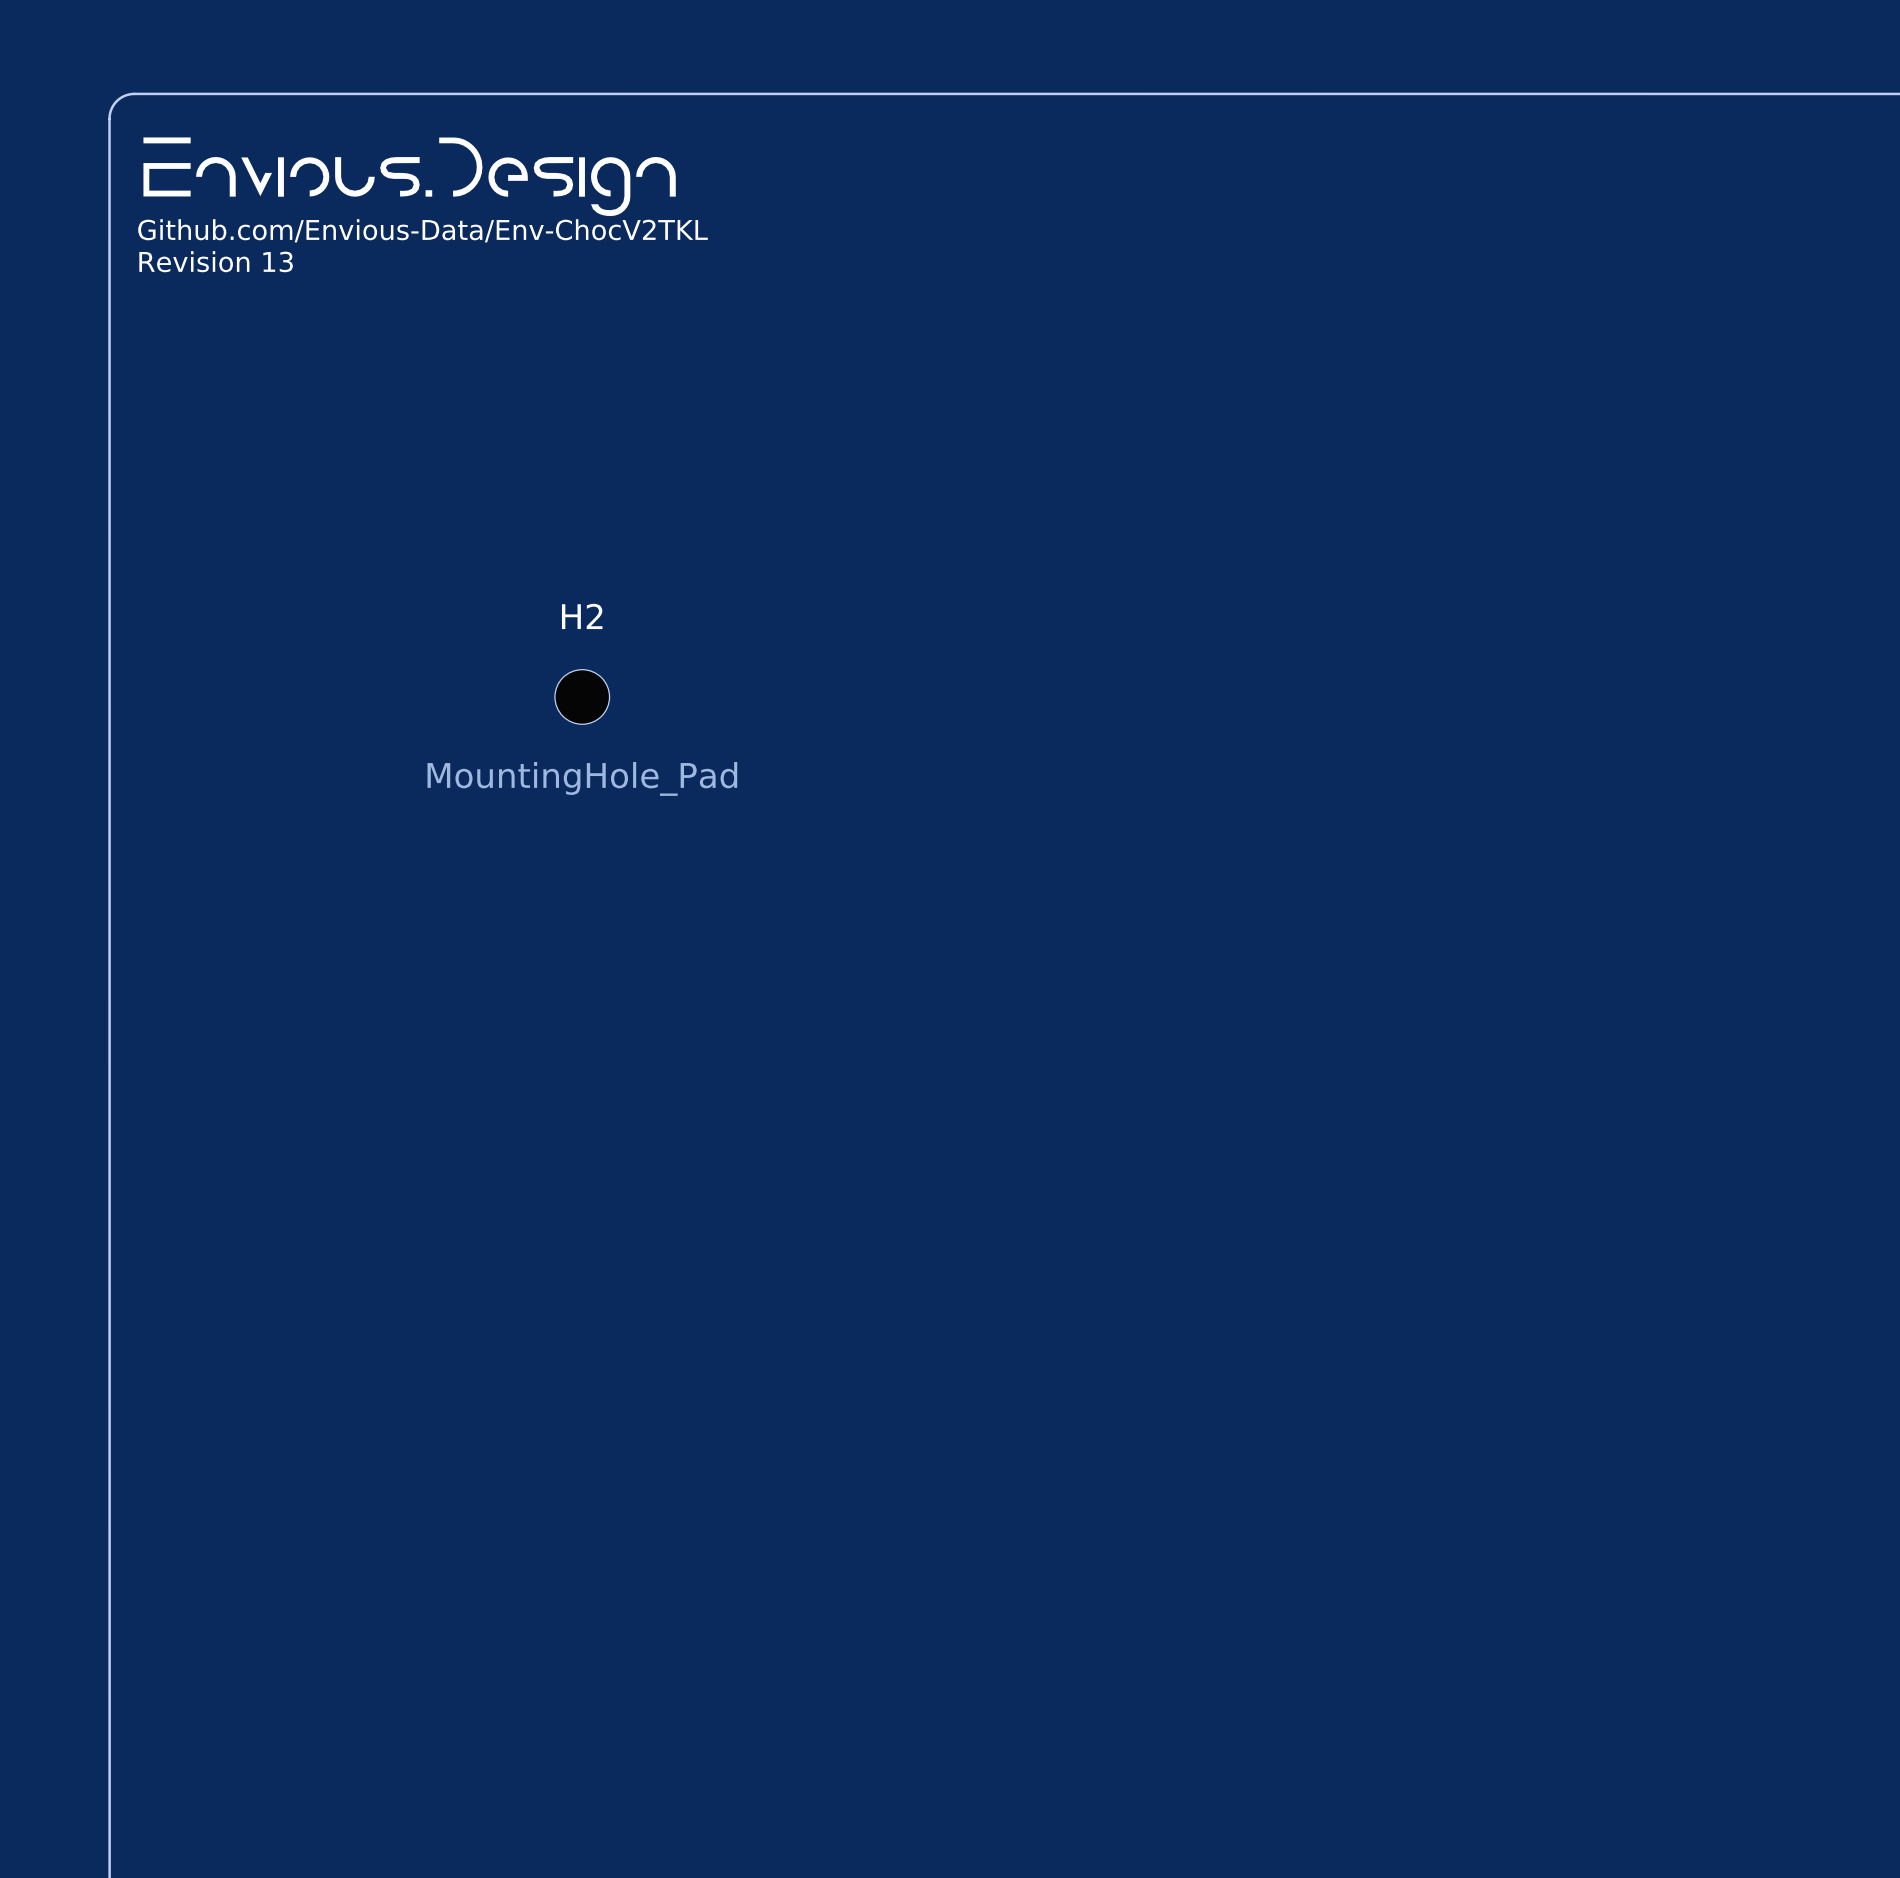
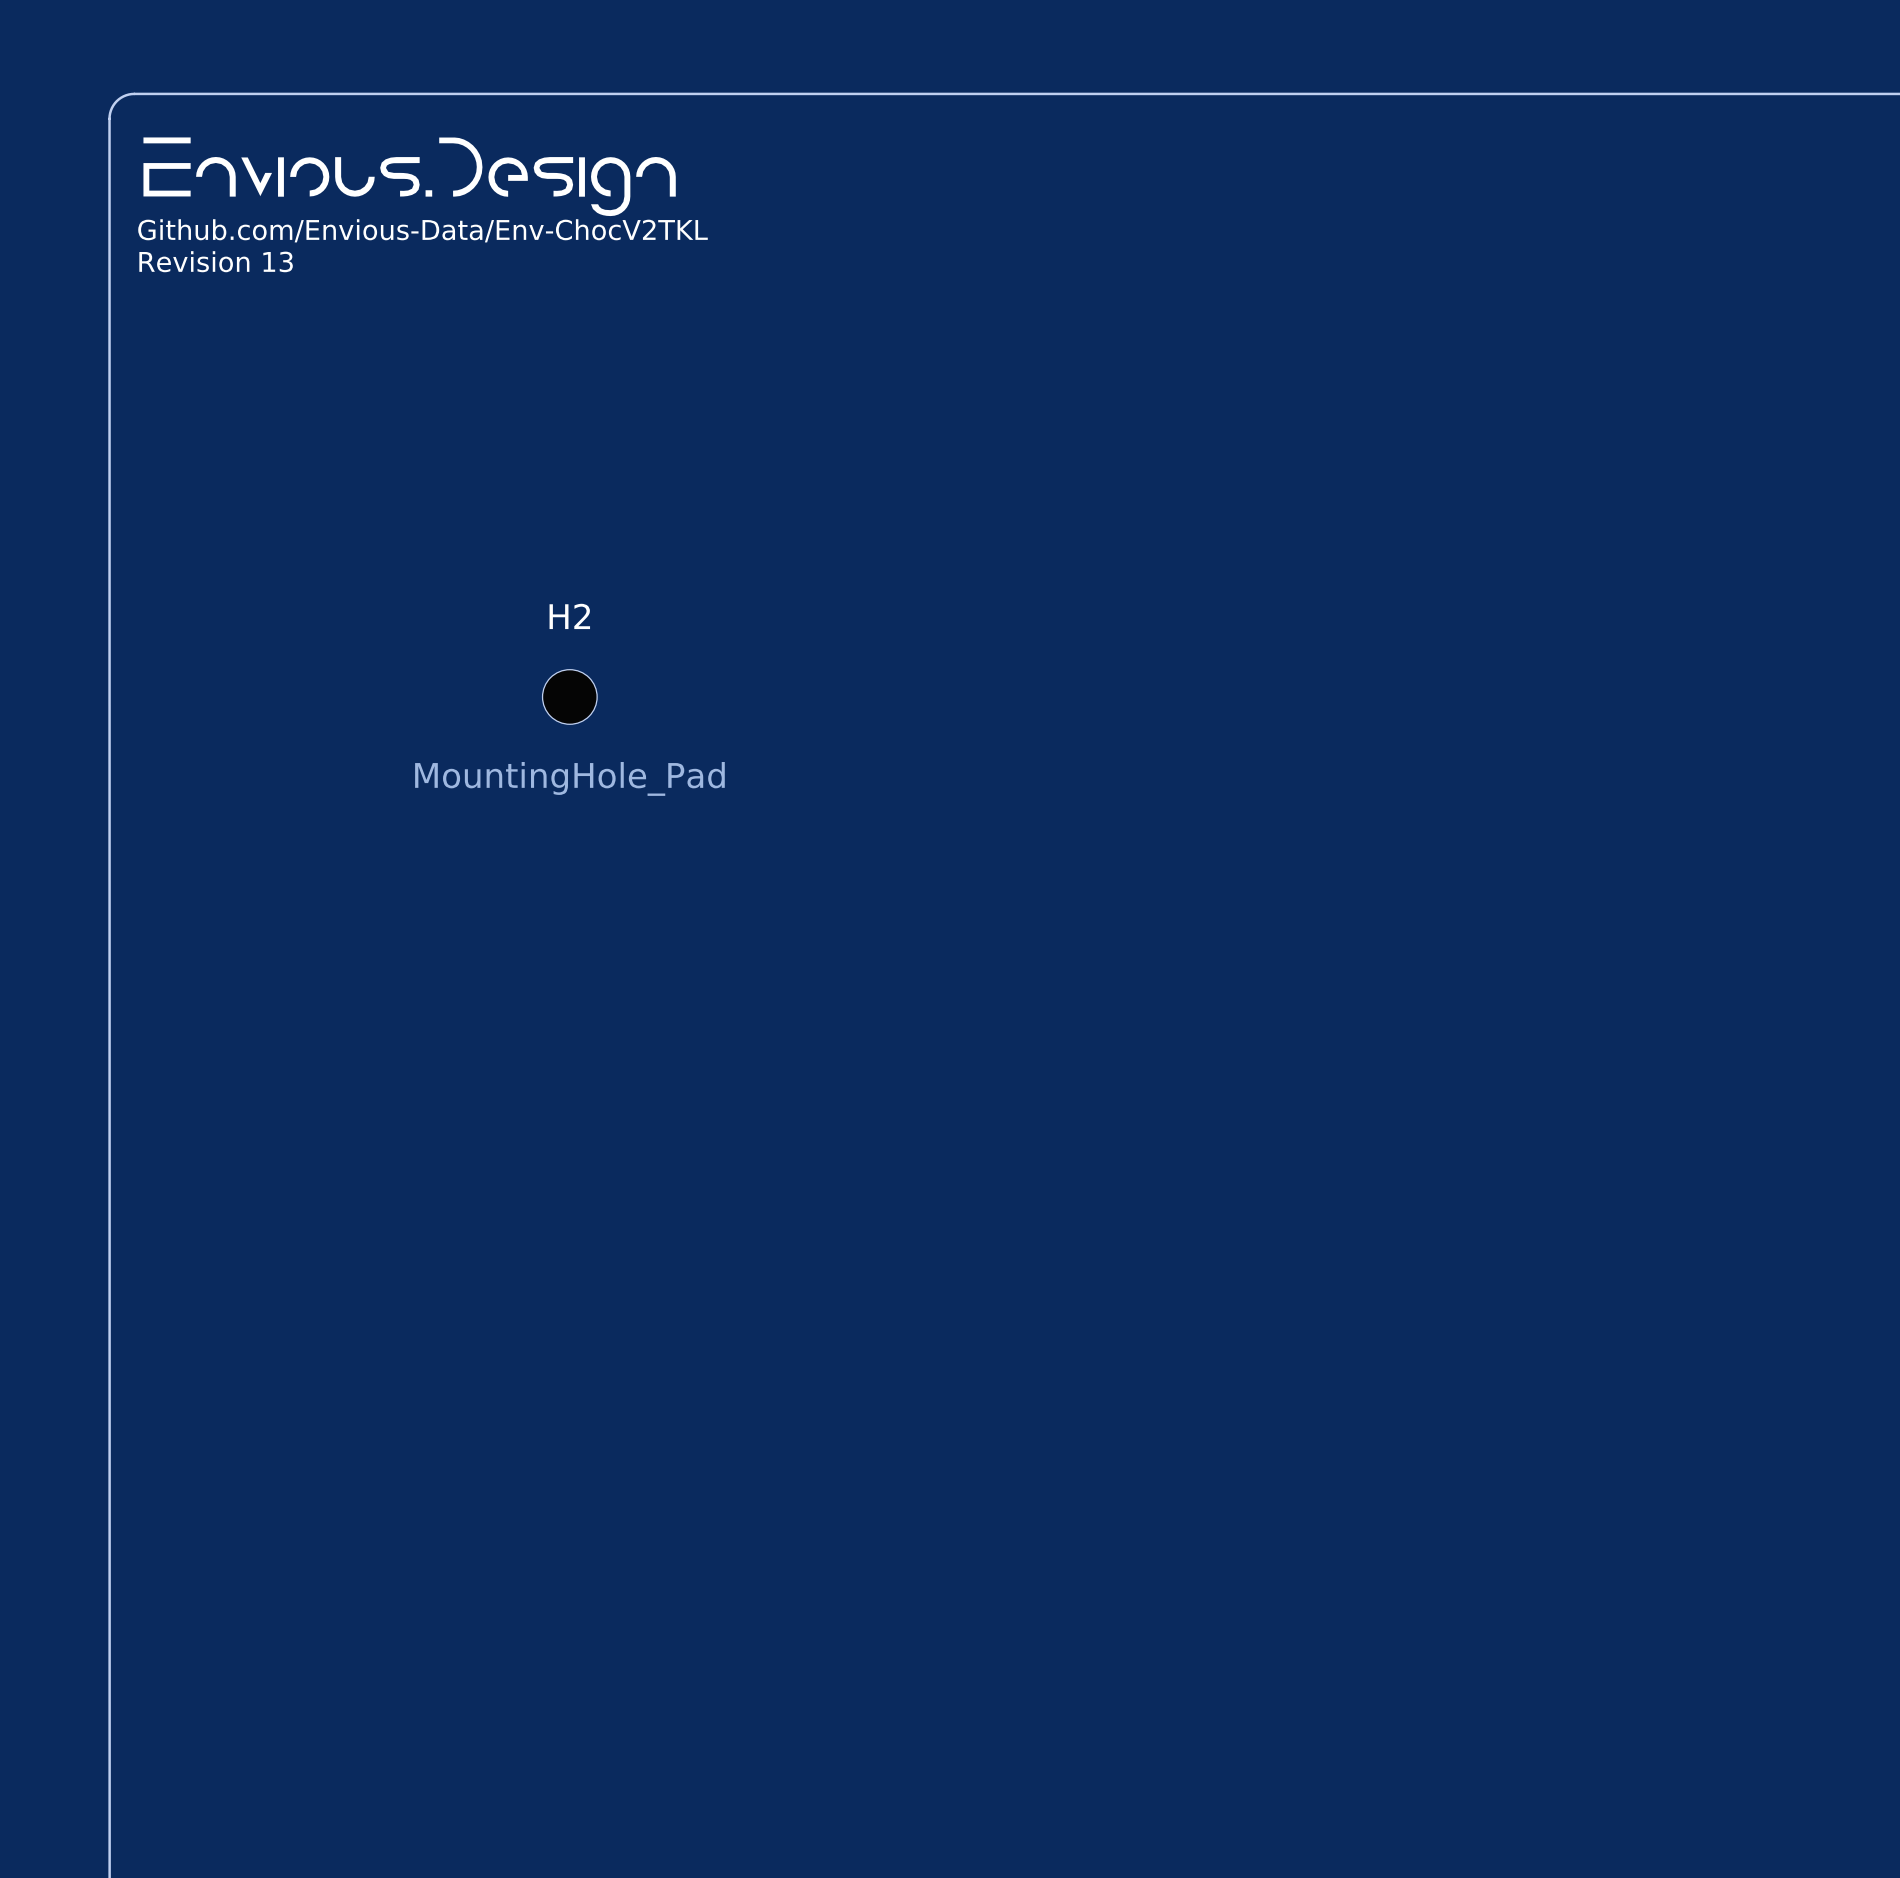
H2 position: (582, 696) -> (569, 696)

